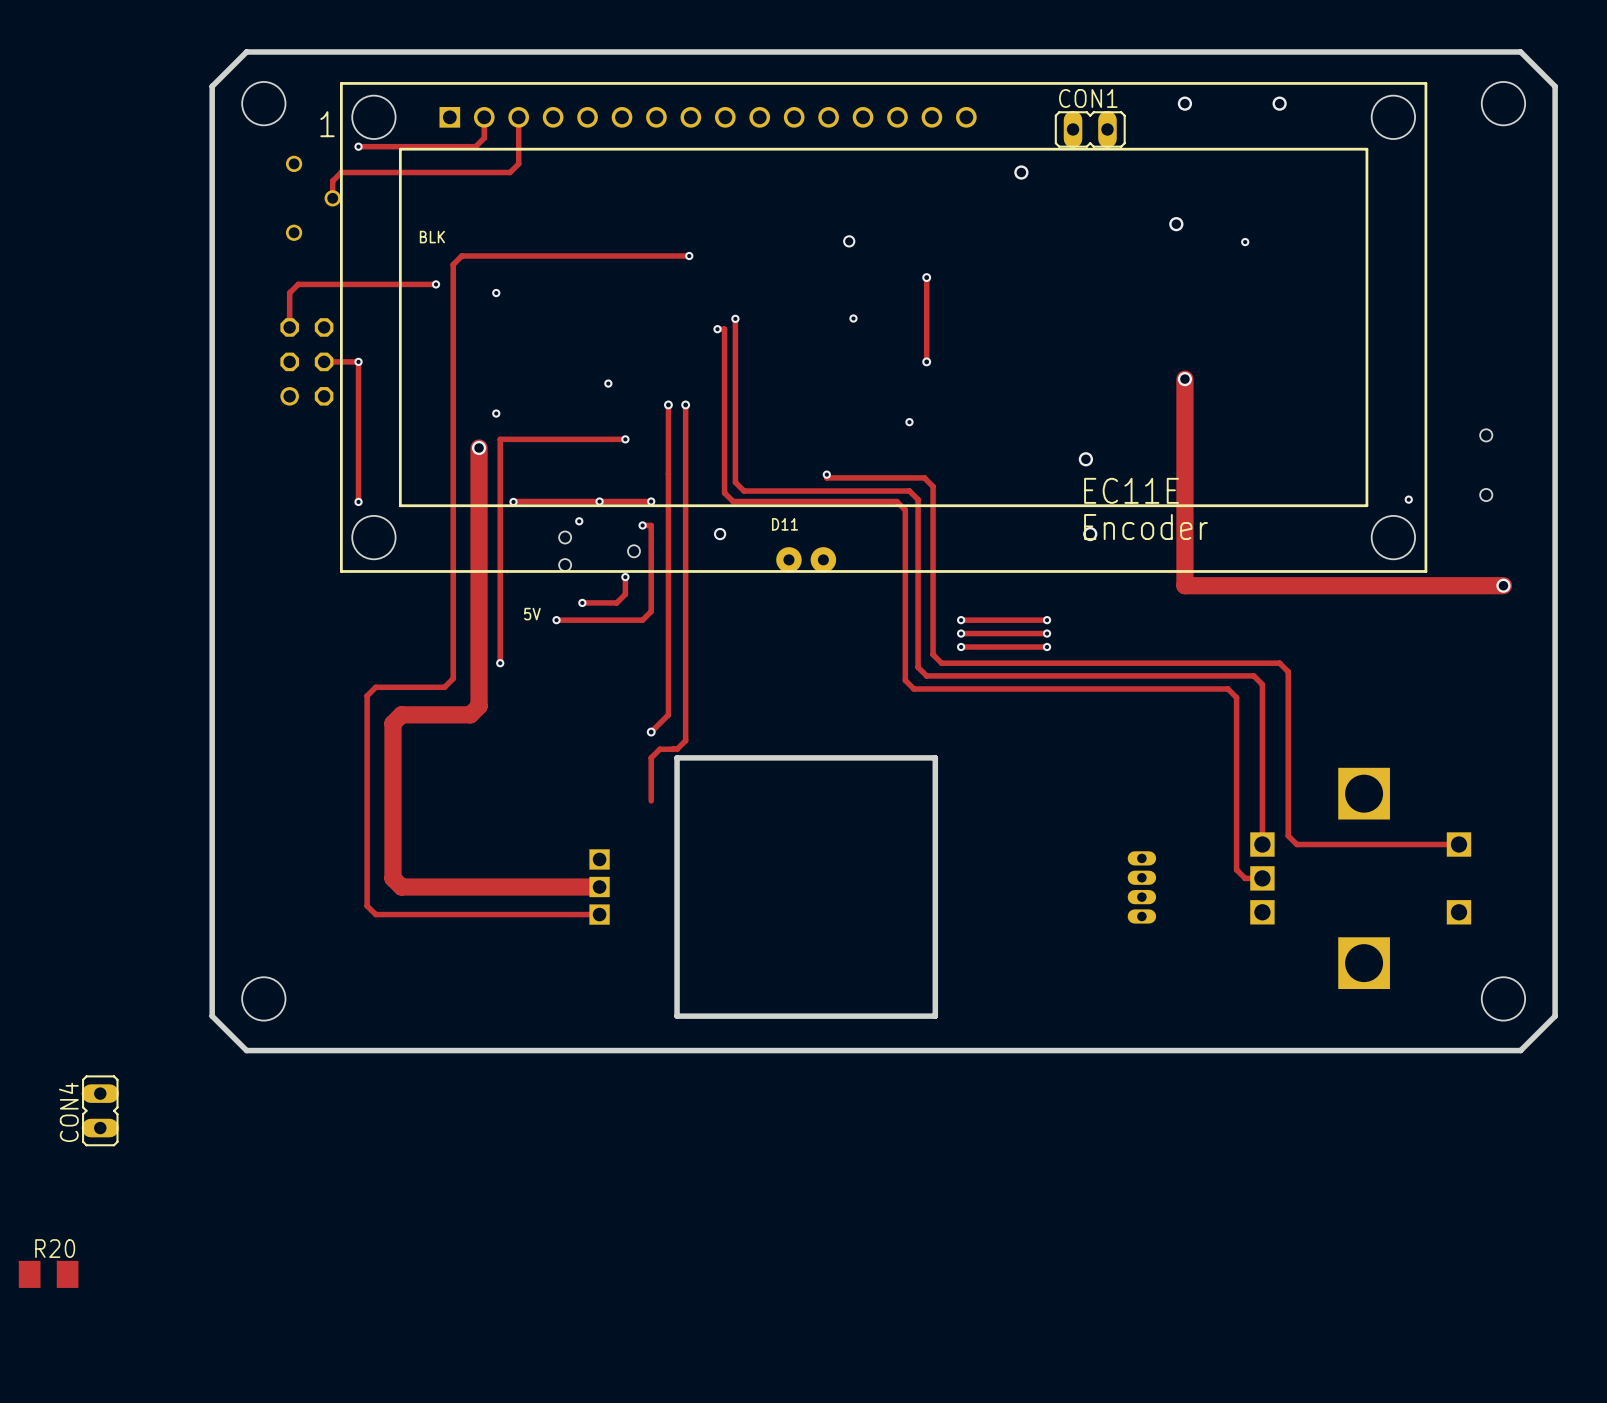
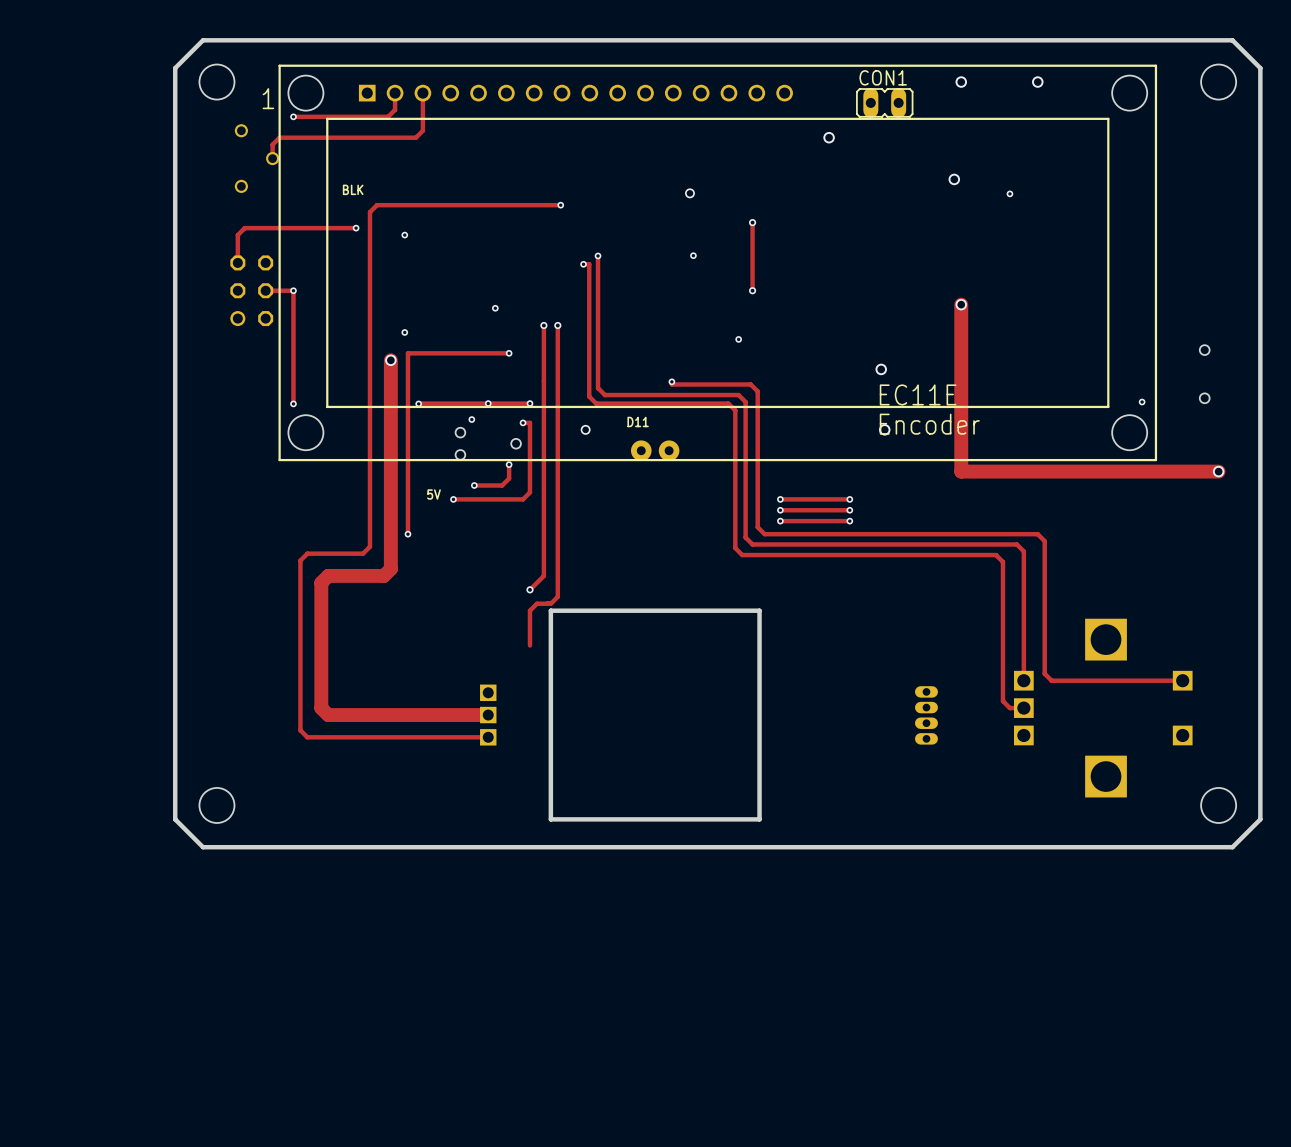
CON4: (100, 1110) -> none
R20: (48, 1274) -> none

